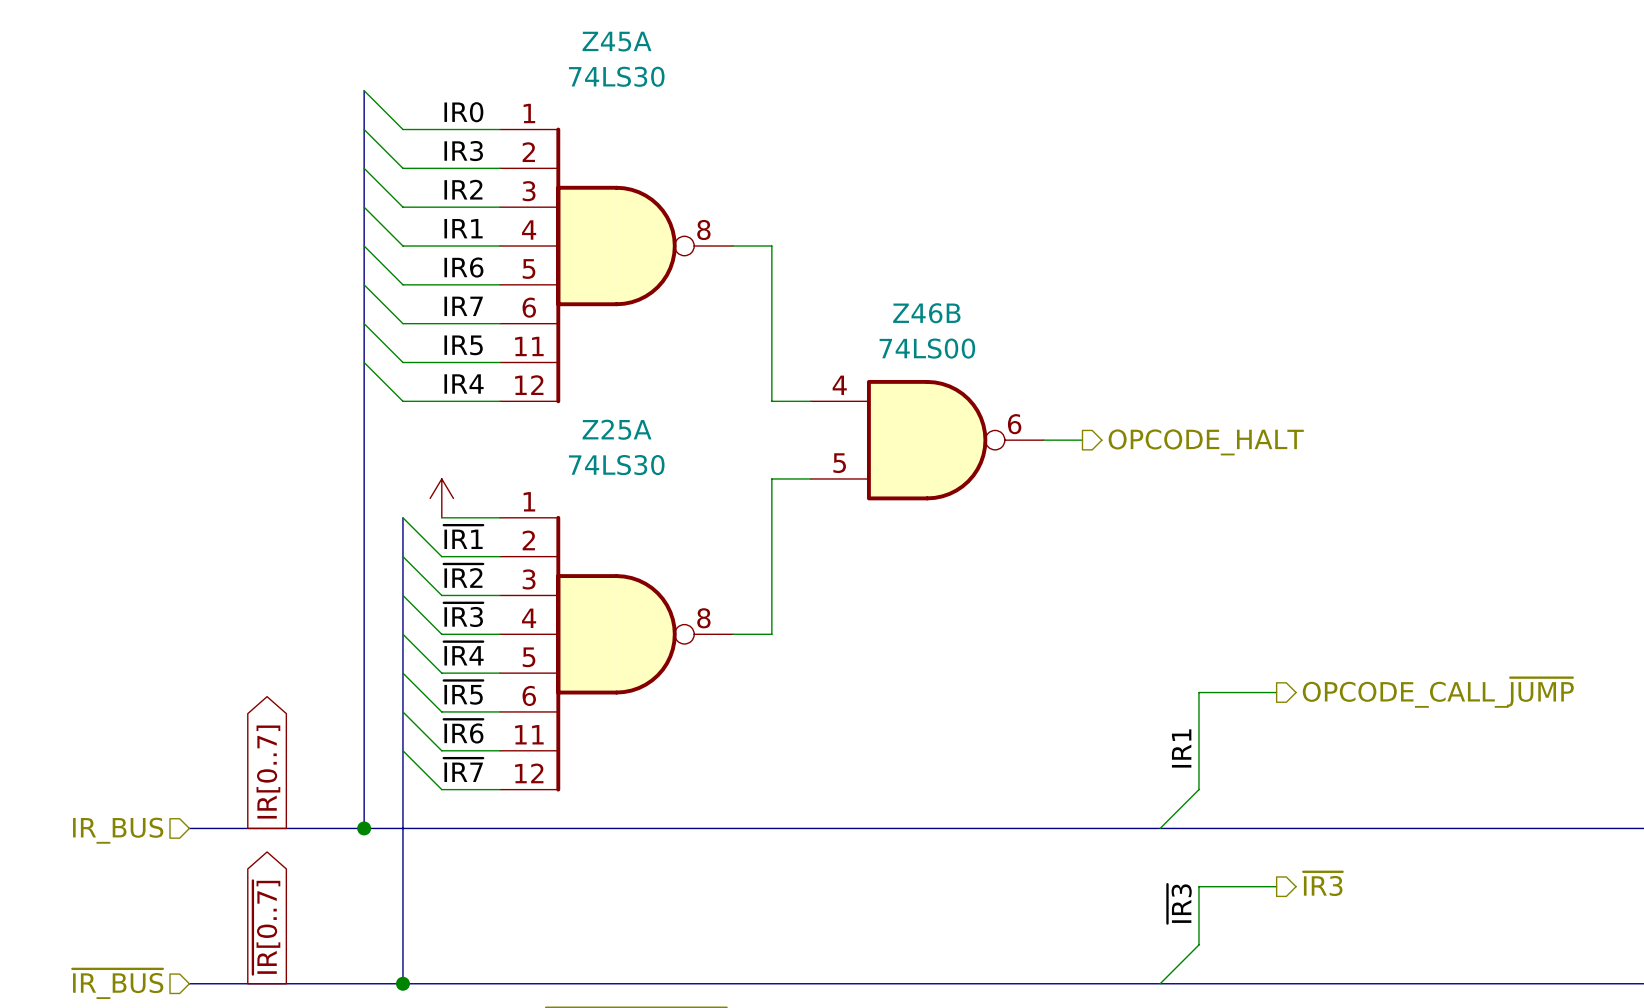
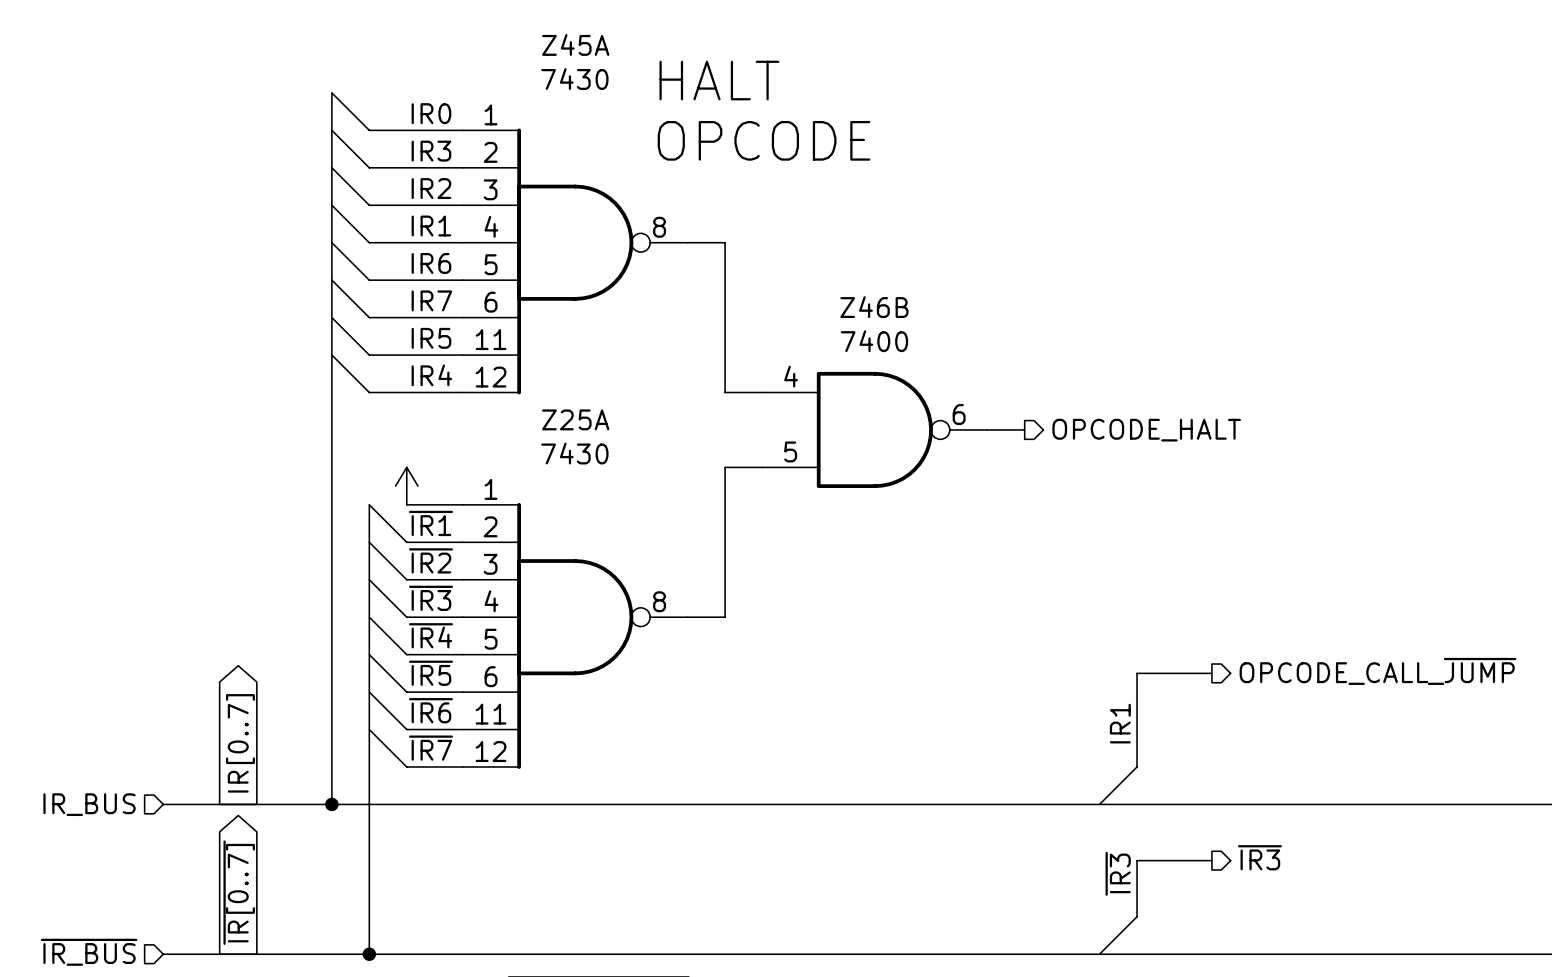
Z45A value: 74LS30 (616, 76) -> 7430 (574, 79)
text: none -> HALT (719, 80)
text: none -> OPCODE (764, 140)
Z46B value: 74LS00 (927, 348) -> 7400 (874, 341)
Z25A value: 74LS30 (616, 465) -> 7430 (574, 453)

